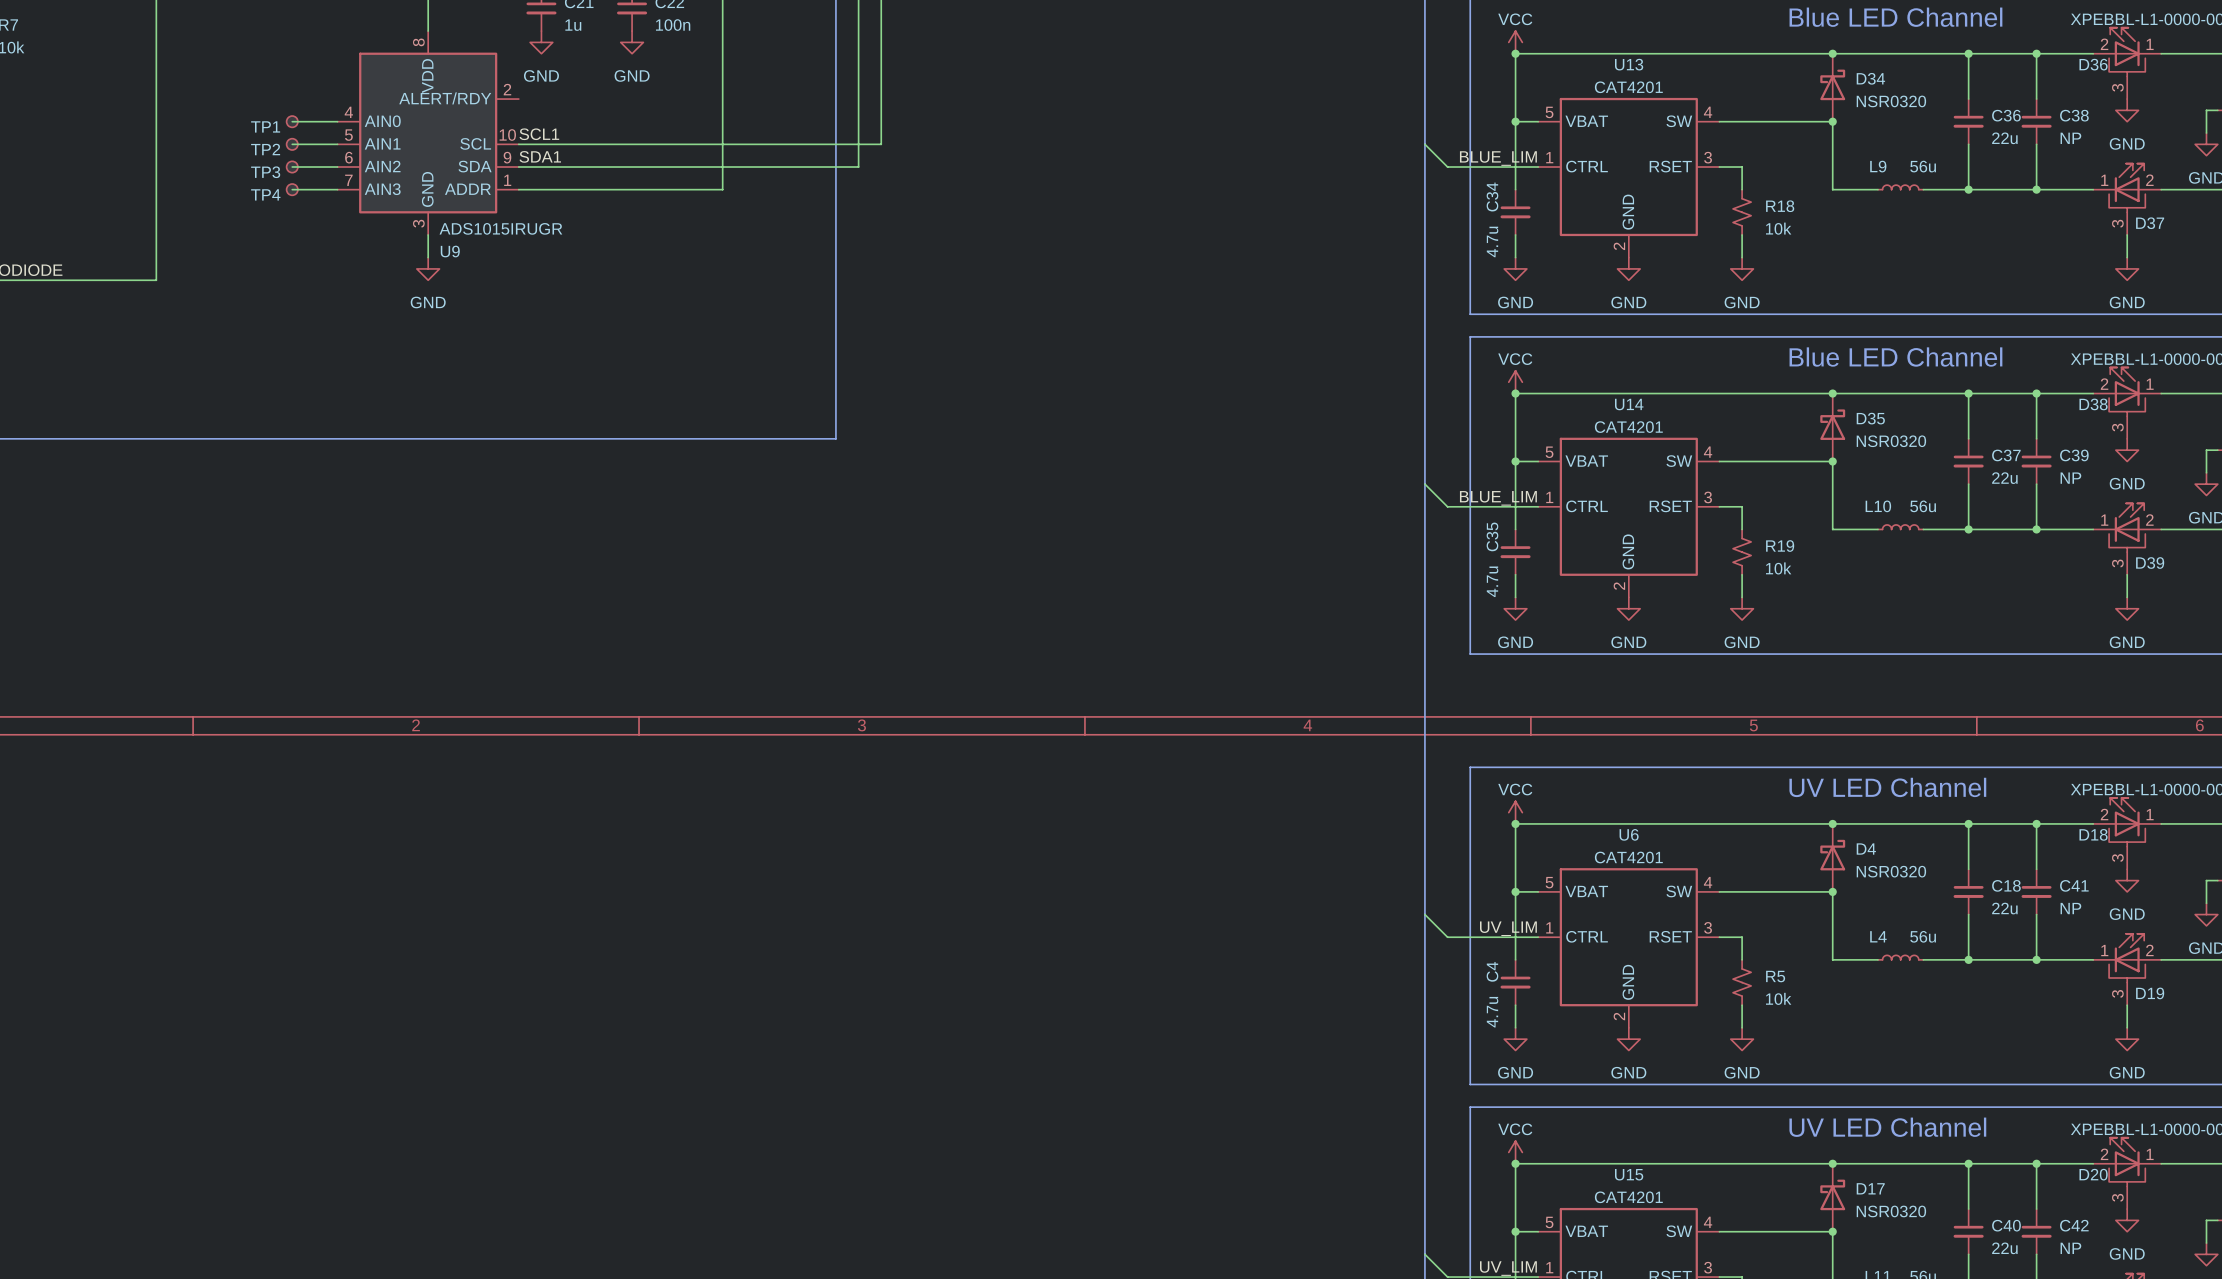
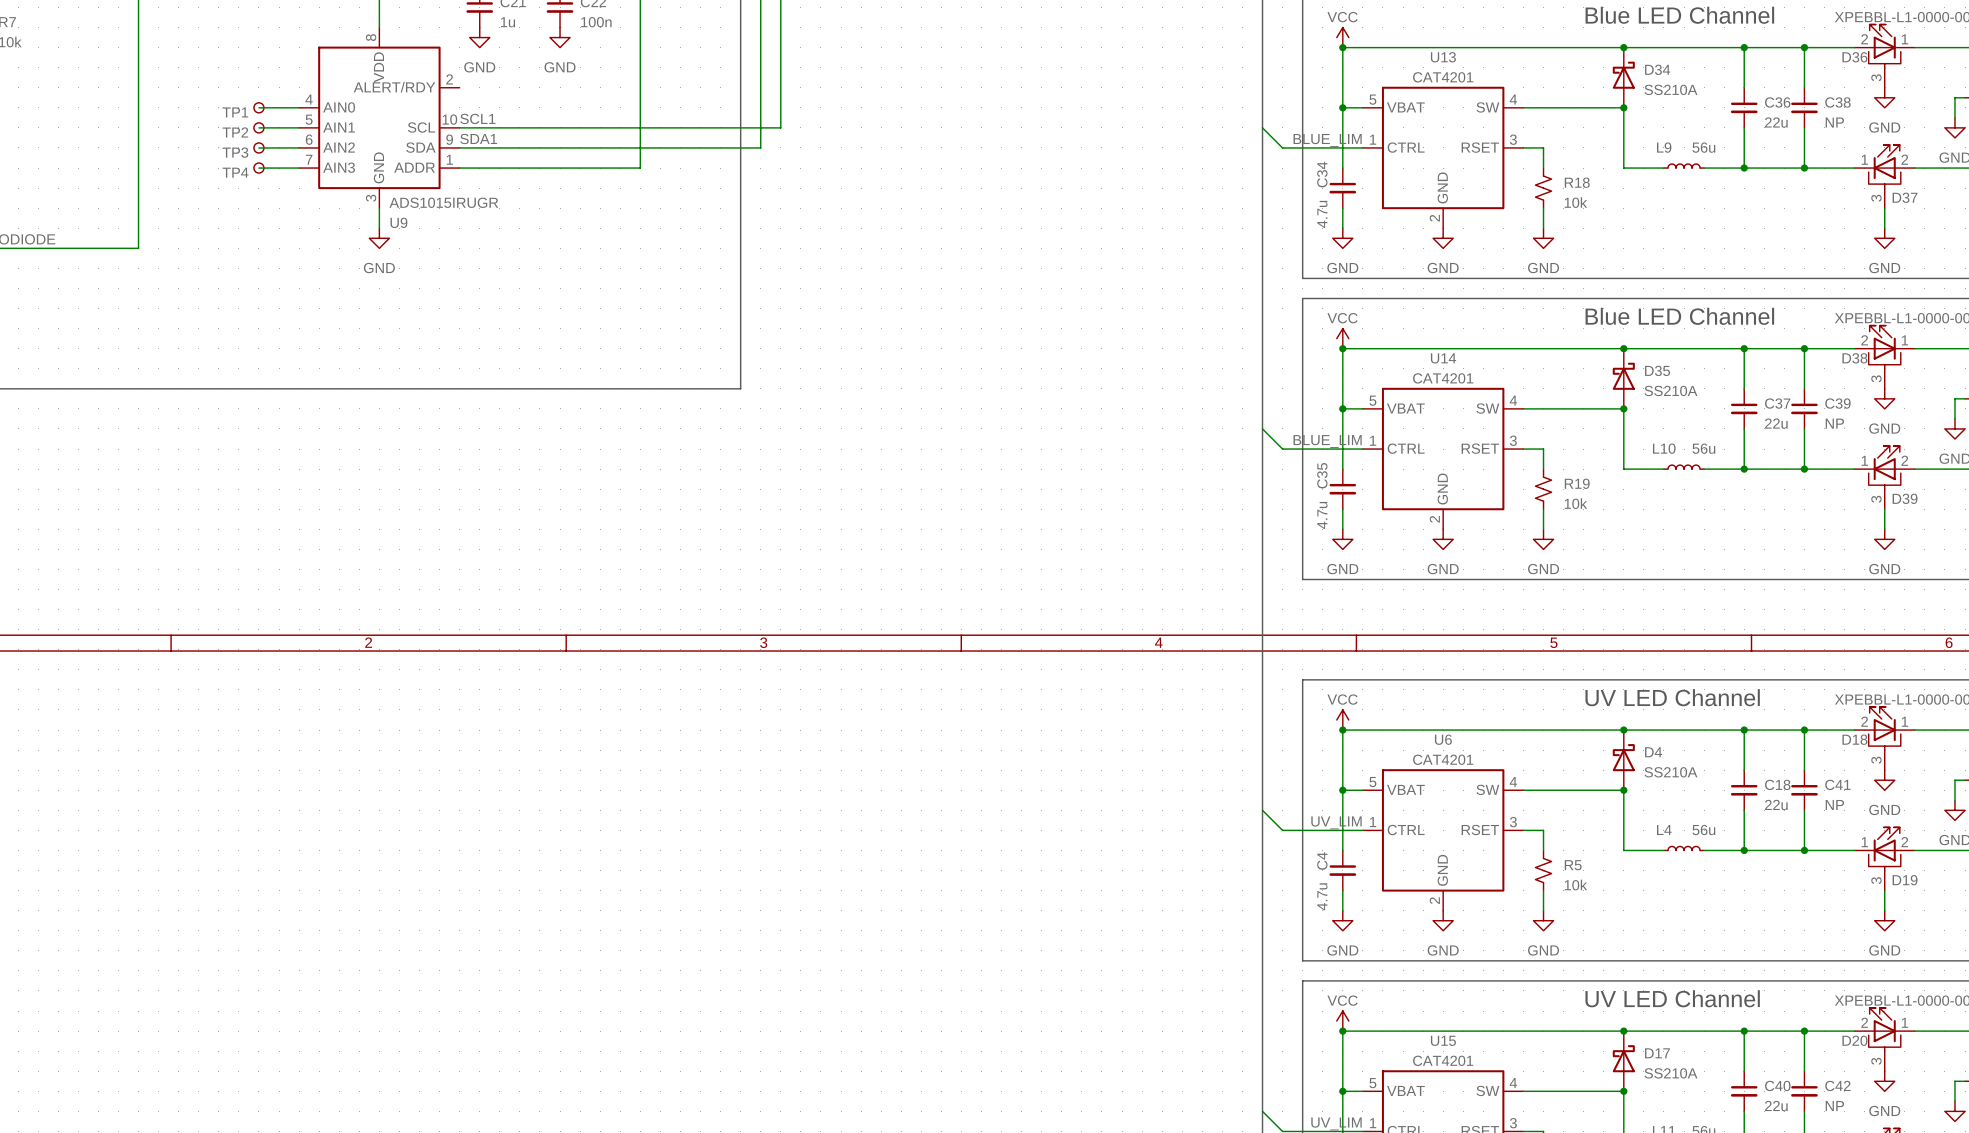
D34 value: NSR0320 (1891, 101) -> SS210A (1670, 89)
D35 value: NSR0320 (1891, 441) -> SS210A (1670, 390)
D4 value: NSR0320 (1891, 871) -> SS210A (1670, 772)
D17 value: NSR0320 (1891, 1211) -> SS210A (1670, 1073)

